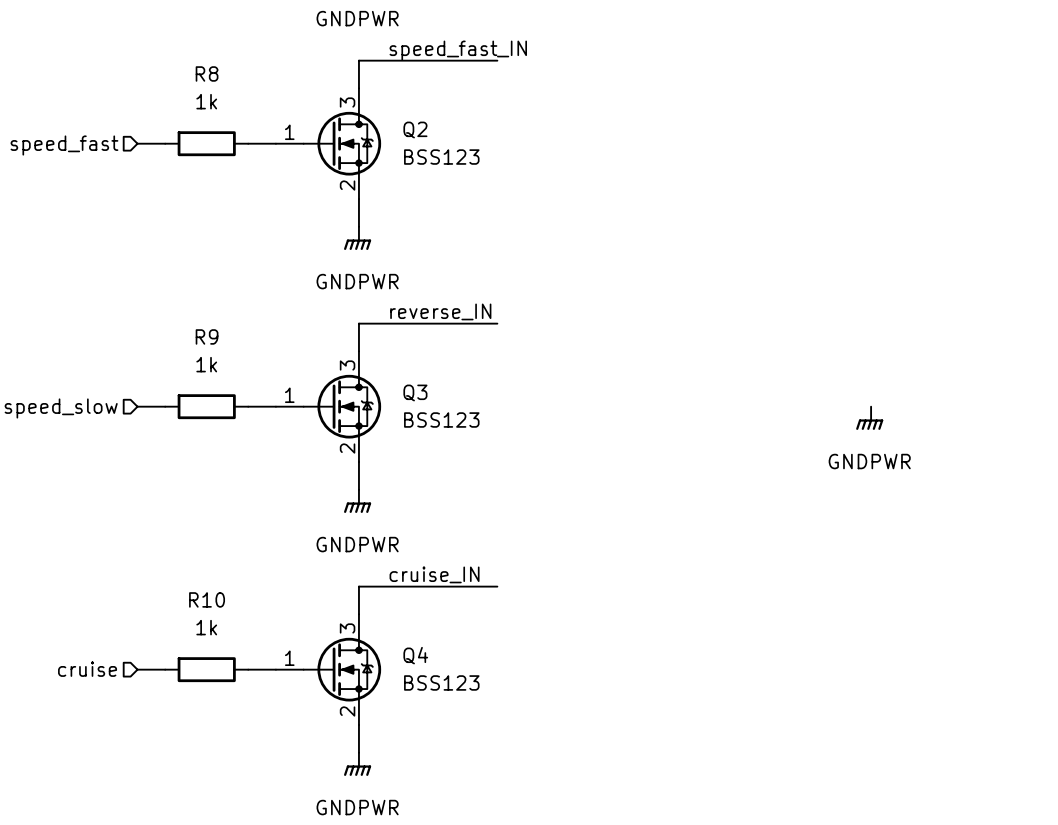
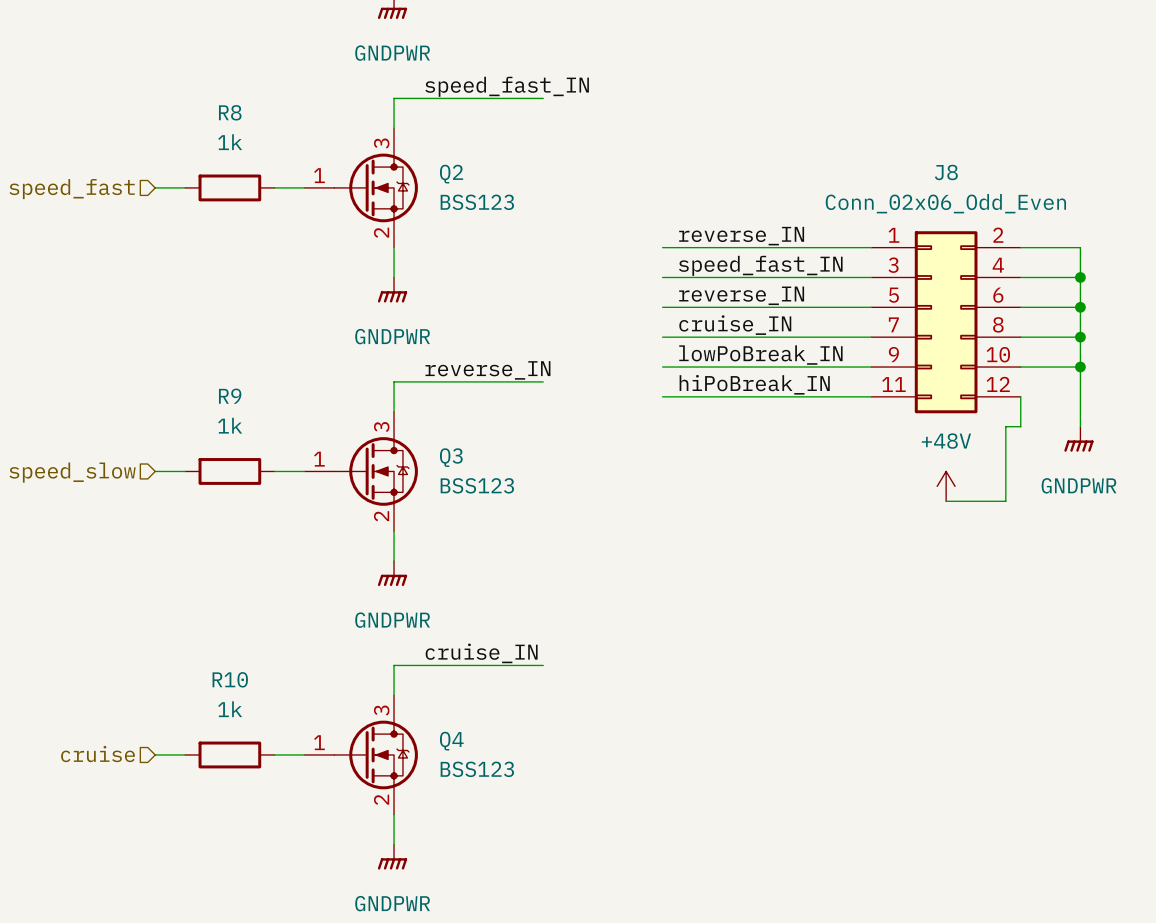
label: none -> reverse_IN (741, 236)
wire: none -> (662, 247) (871, 247)
wire: none -> (1020, 247) (1080, 247) (1080, 426)
label: none -> speed_fast_IN (760, 265)
wire: none -> (662, 277) (871, 277)
wire: none -> (1020, 277) (1080, 277)
junction: none -> (1080, 277)
label: none -> reverse_IN (741, 295)
wire: none -> (662, 307) (871, 307)
wire: none -> (1020, 307) (1080, 307)
junction: none -> (1080, 307)
J8: none -> Conn_02x06_Odd_Even (946, 322)
label: none -> cruise_IN (735, 325)
wire: none -> (662, 337) (871, 337)
wire: none -> (1020, 337) (1080, 337)
junction: none -> (1080, 337)
label: none -> lowPoBreak_IN (760, 355)
wire: none -> (662, 367) (871, 367)
wire: none -> (1020, 367) (1080, 367)
junction: none -> (1080, 367)
label: none -> hiPoBreak_IN (754, 384)
wire: none -> (662, 396) (871, 396)
wire: none -> (1020, 396) (1020, 426) (1005, 426) (1005, 501) (946, 501)
power symbol: none -> GNDPWR (1078, 439)
power symbol: GNDPWR (869, 418) -> +48V (946, 486)

